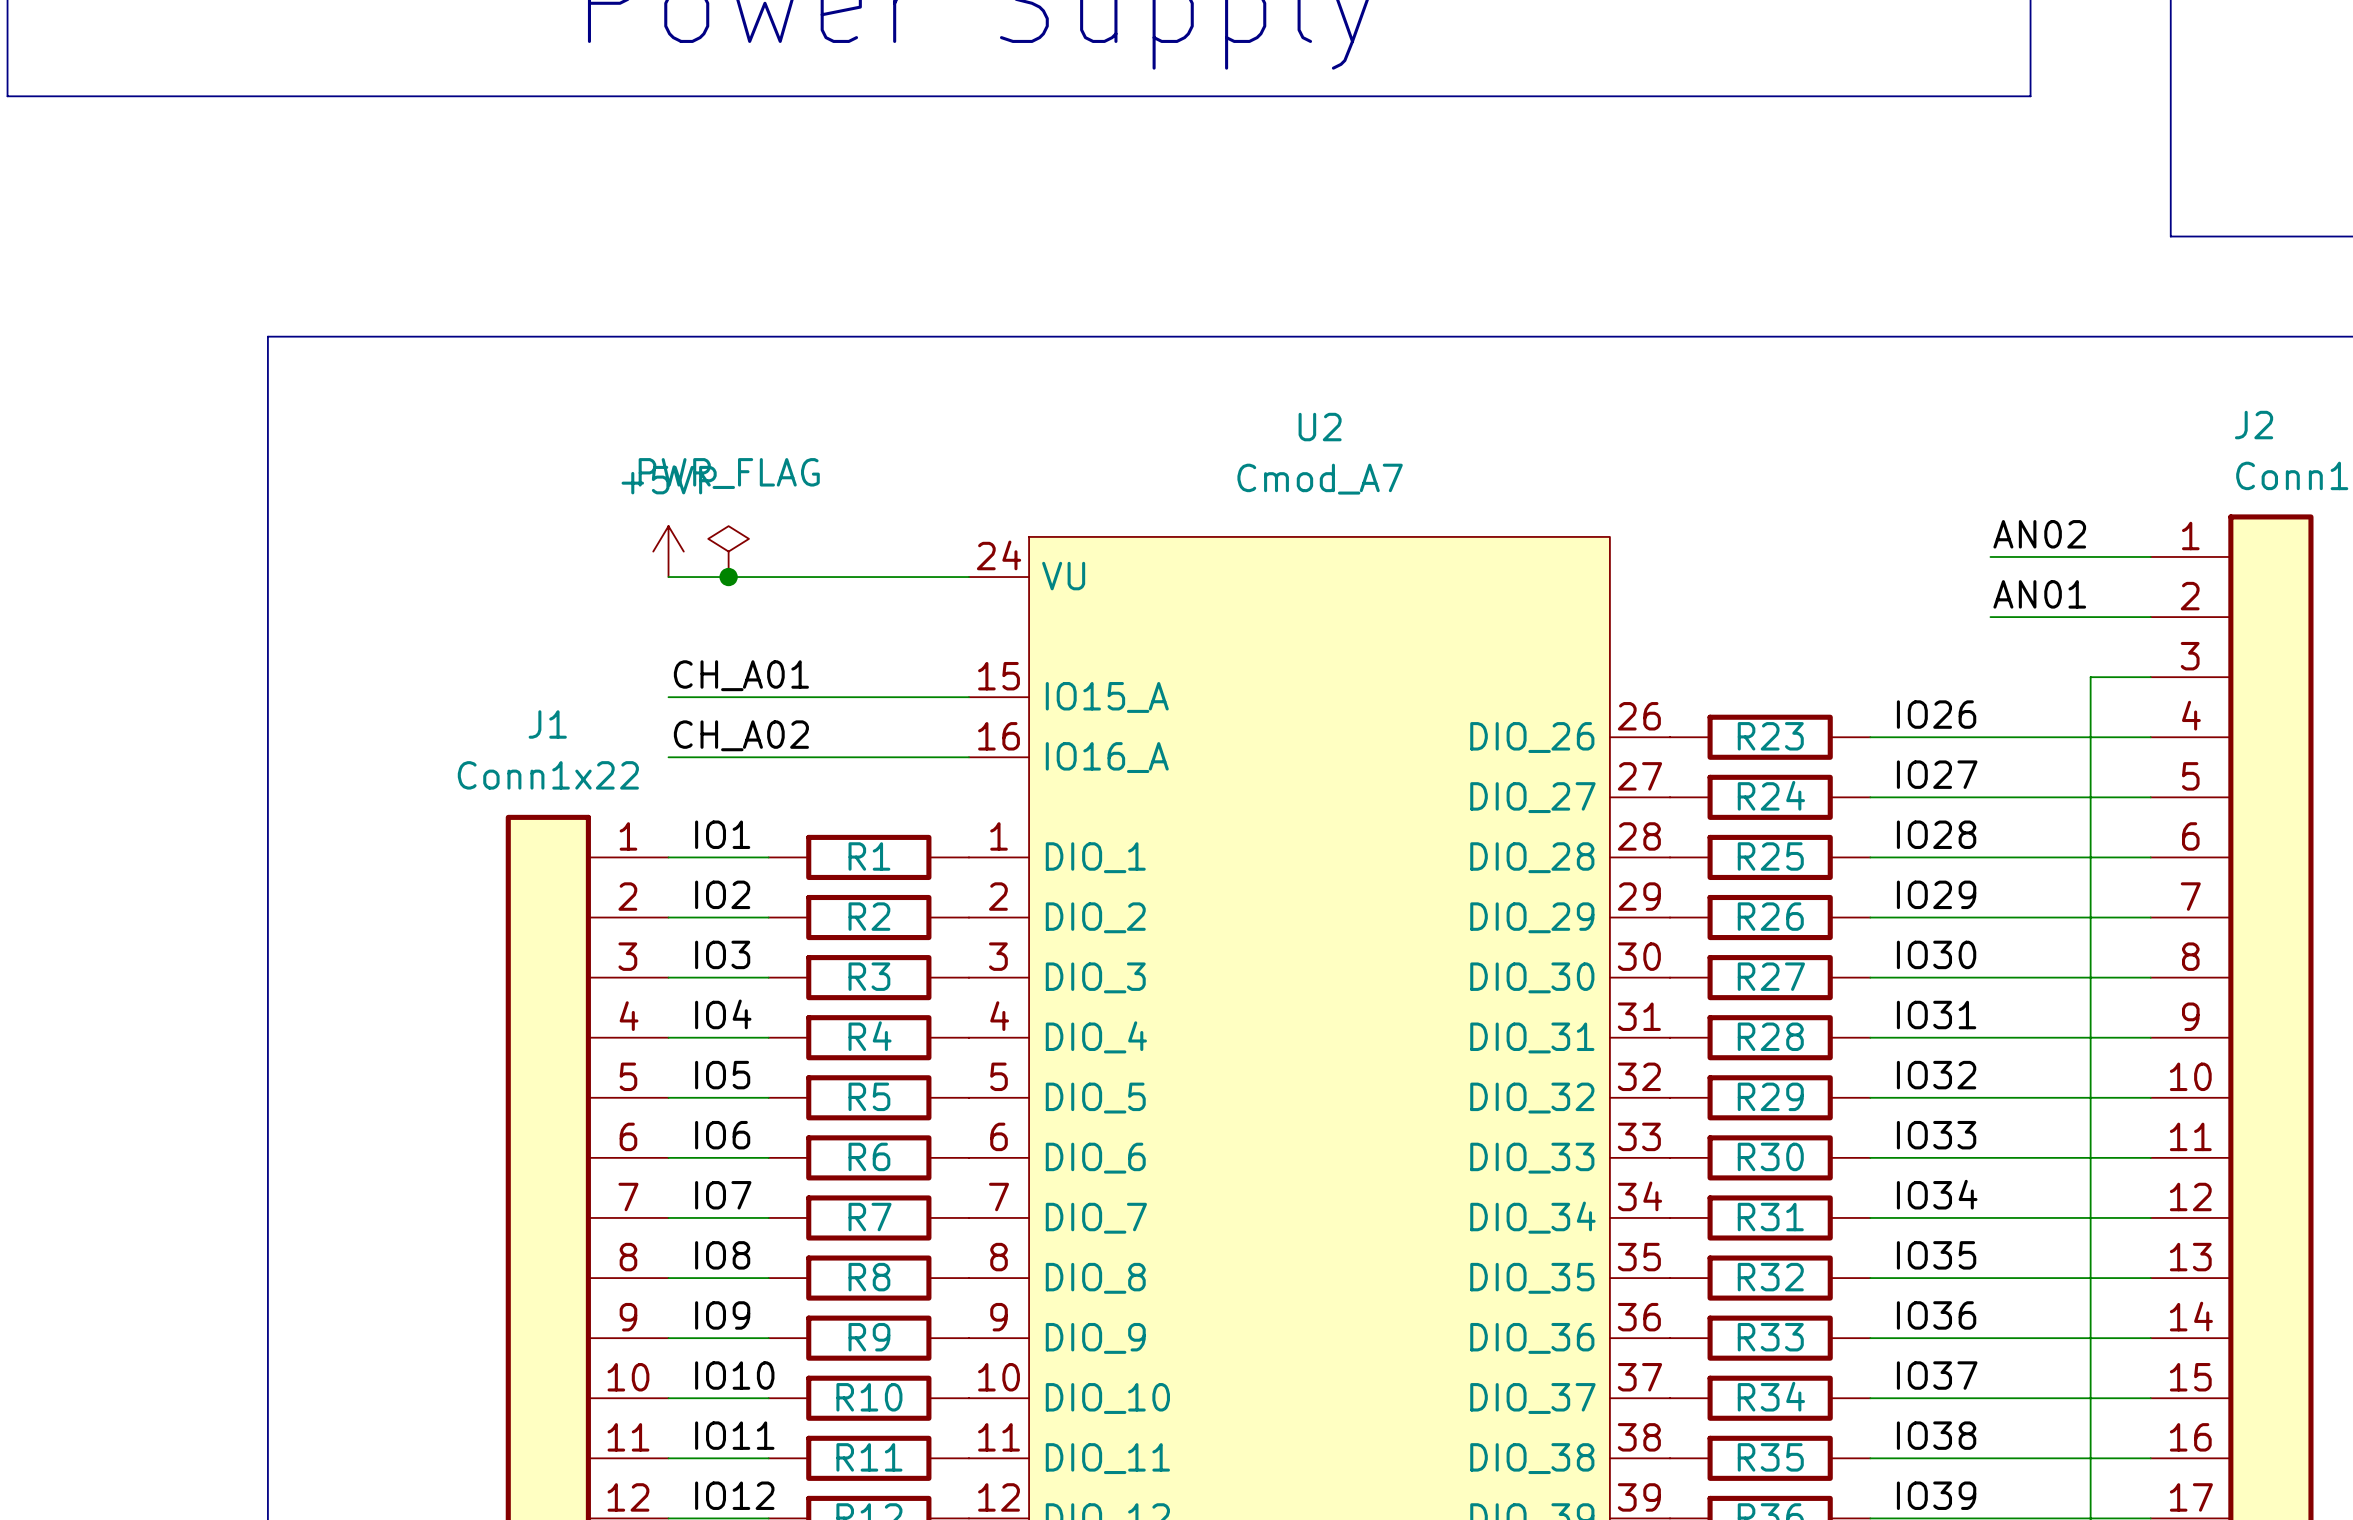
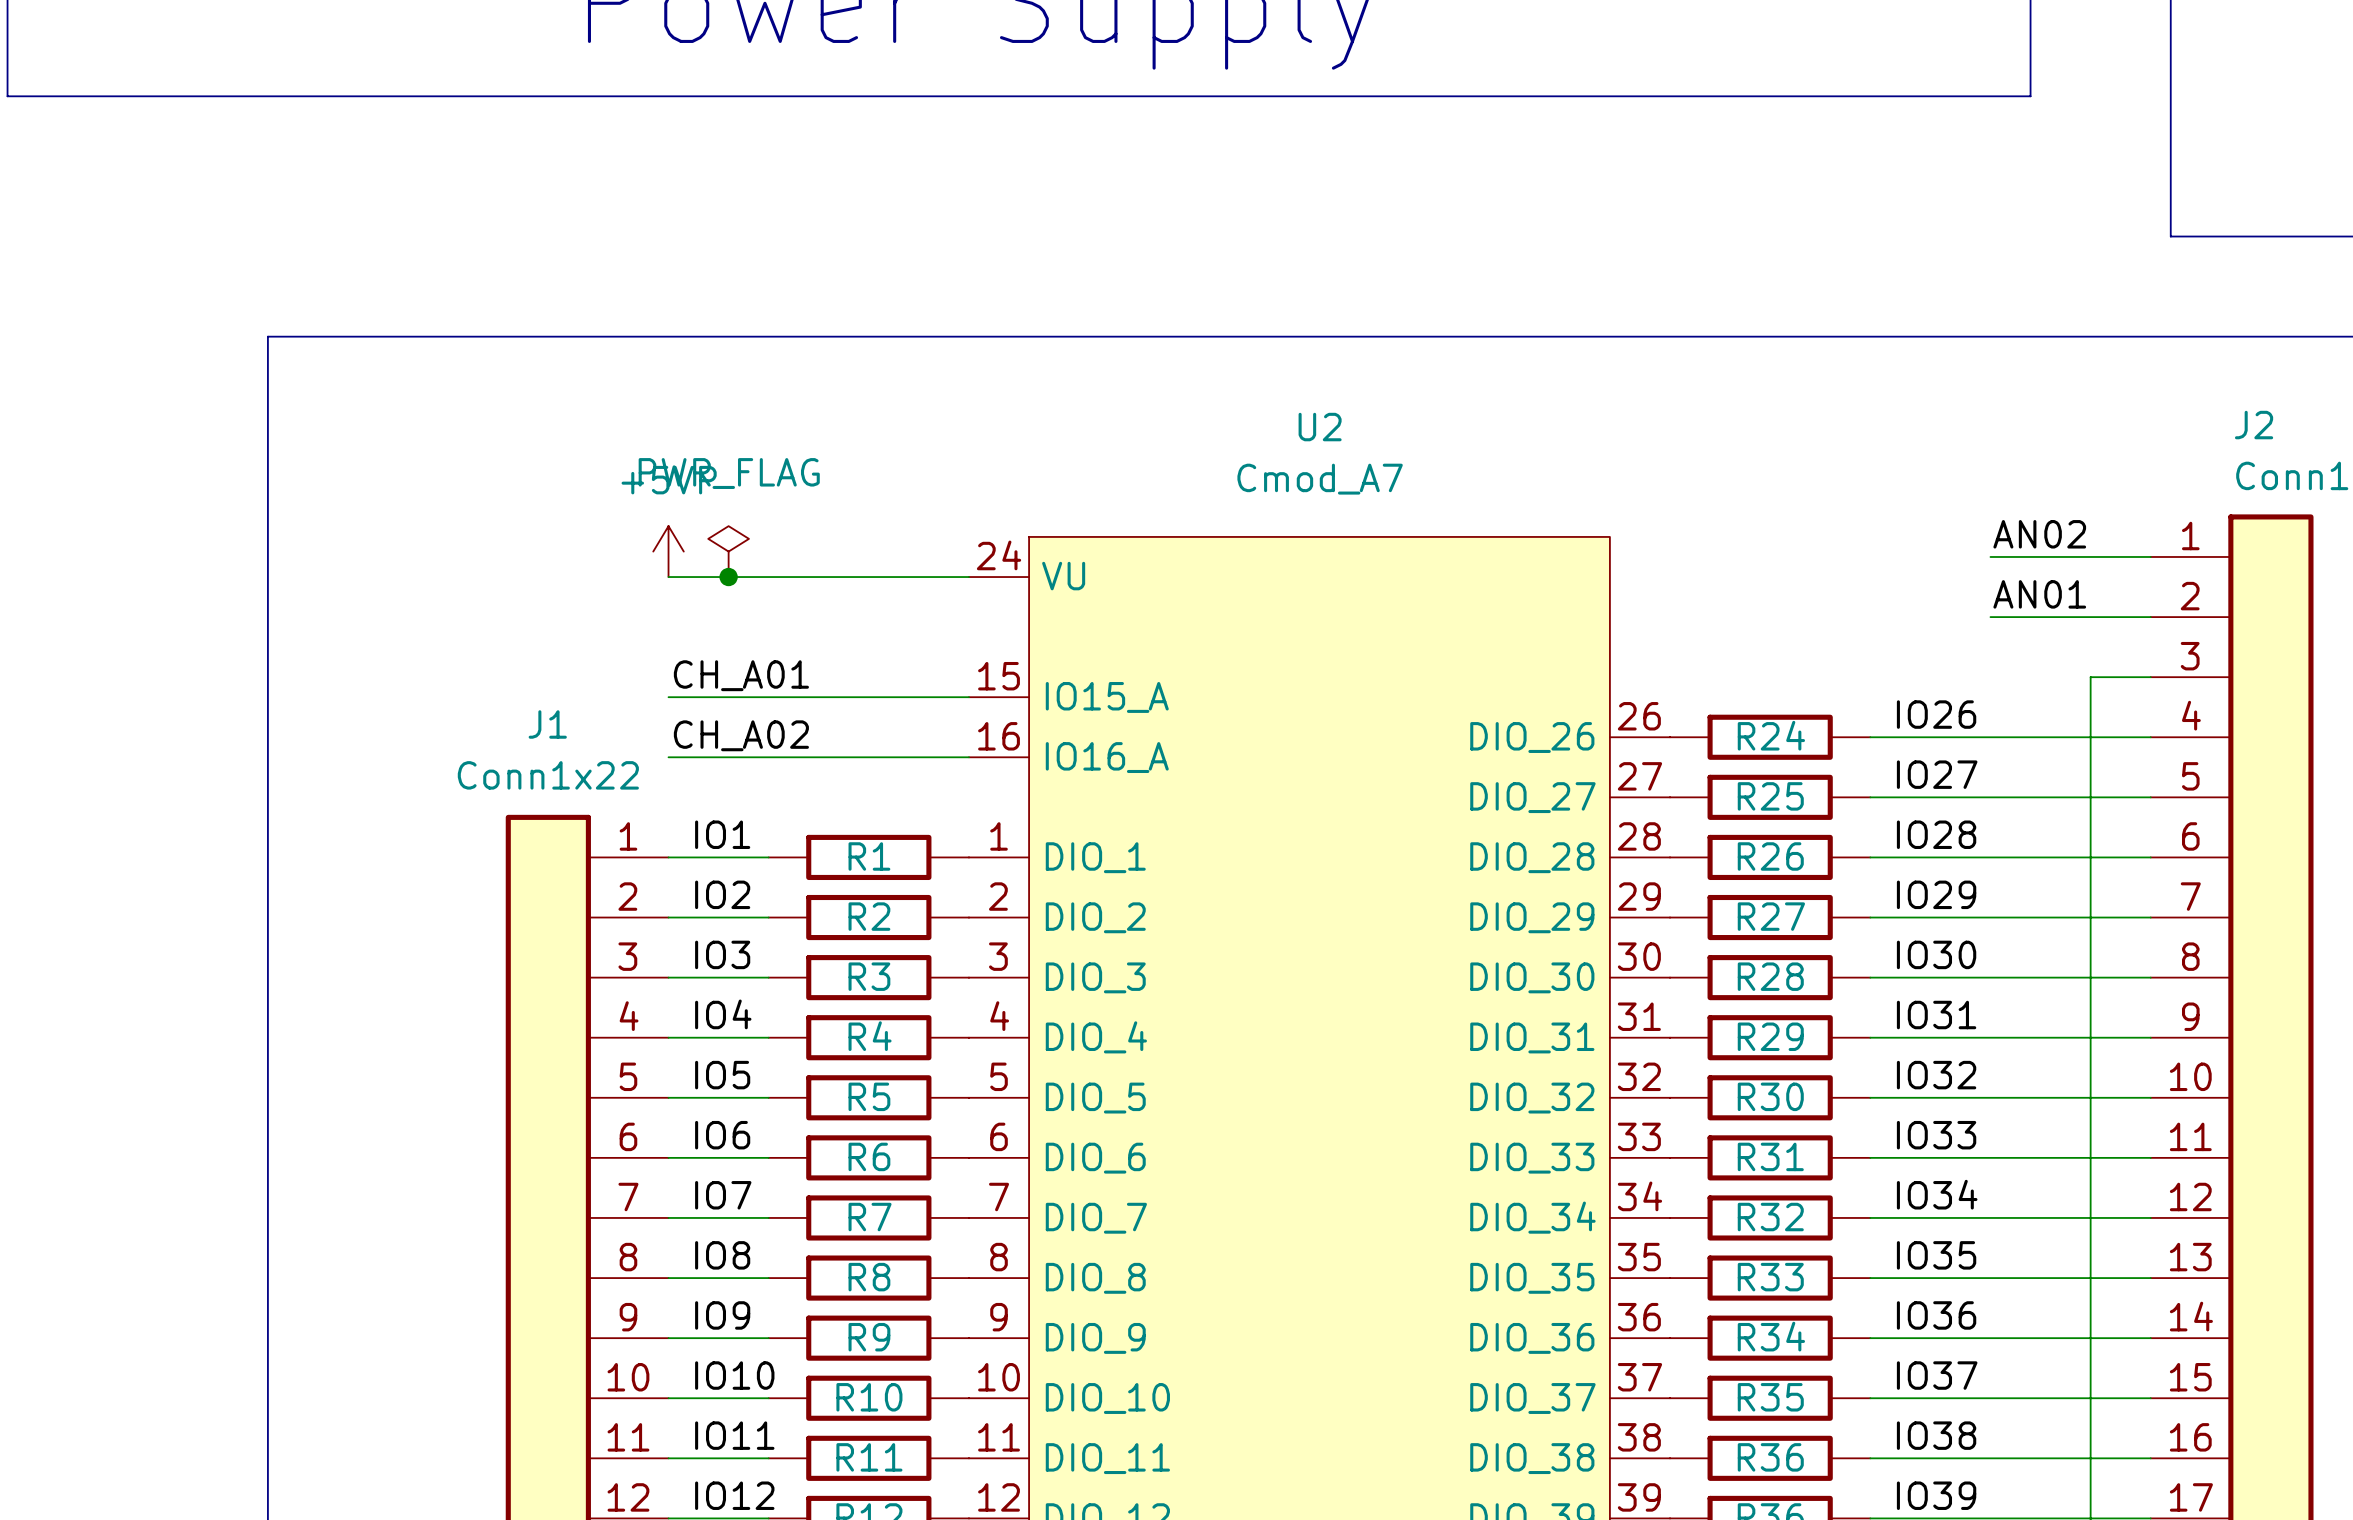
R23 name: R23 (1770, 736) -> R24 (1771, 735)
R24 name: R24 (1771, 795) -> R25 (1770, 796)
R25 name: R25 (1770, 856) -> R26 (1770, 856)
R26 name: R26 (1770, 916) -> R27 (1771, 916)
R27 name: R27 (1771, 976) -> R28 (1770, 976)
R28 name: R28 (1770, 1036) -> R29 (1770, 1036)
R29 name: R29 (1770, 1096) -> R30 (1770, 1096)
R30 name: R30 (1770, 1156) -> R31 (1770, 1156)
R31 name: R31 (1770, 1217) -> R32 (1770, 1217)
R32 name: R32 (1770, 1277) -> R33 (1770, 1277)
R33 name: R33 (1770, 1337) -> R34 (1771, 1336)
R34 name: R34 (1771, 1396) -> R35 (1770, 1397)
R35 name: R35 (1770, 1457) -> R36 (1770, 1457)

